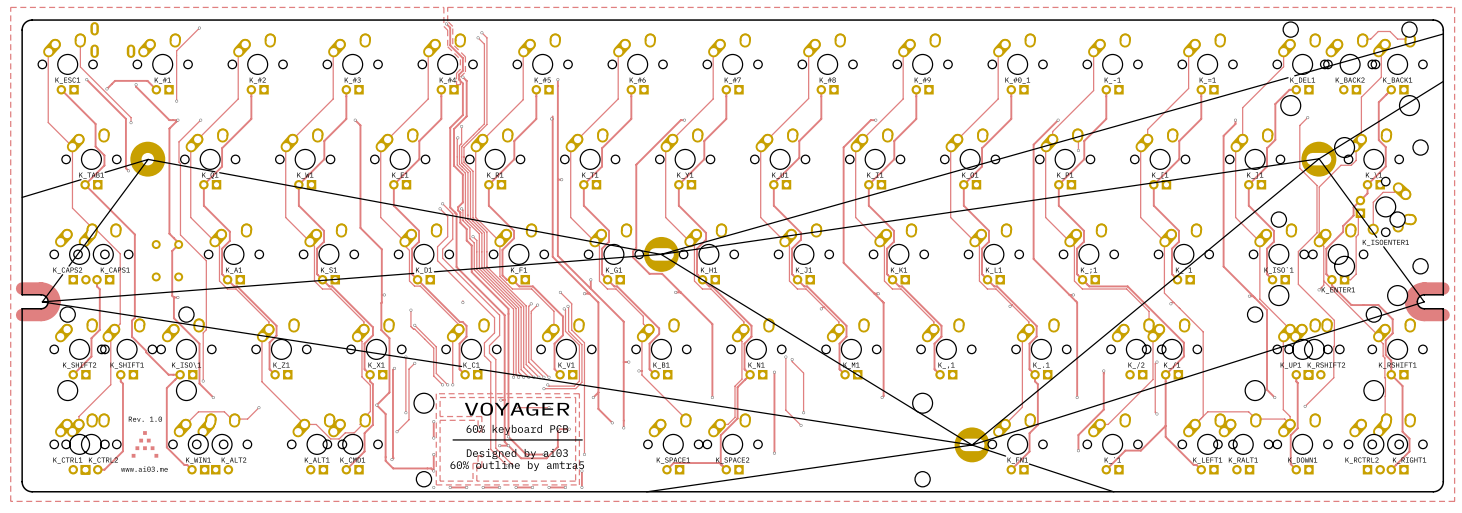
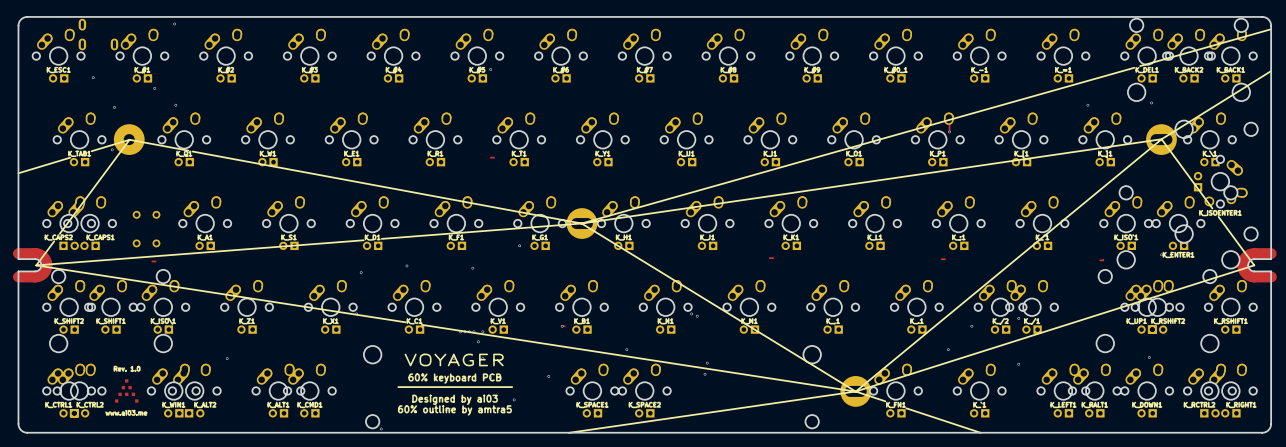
zone outline: (10, 7) (443, 7) (443, 26) (447, 30) (447, 46) (460, 59) (460, 69) (456, 73) (456, 84) (460, 84) (460, 77) (465, 72) (465, 56) (452, 44) (452, 26) (447, 21) (447, 7) (1454, 7) (1454, 501) (10, 501) (10, 7) -> none
track: (446, 23) (450, 27) (450, 45) (462, 58) (462, 70) (459, 74) (459, 79) (462, 83) (462, 115) (450, 127) (450, 207) (456, 214) (456, 267) (504, 315) (504, 441) (521, 458) (546, 458) (557, 446) (557, 429) (569, 429) -> none
via: (446, 23) -> none
track: (198, 28) (176, 50) (176, 101) -> none
track: (481, 32) (486, 37) (486, 124) (463, 147) (463, 162) (473, 171) (473, 218) (486, 231) (486, 266) (526, 305) (526, 364) (538, 377) -> none
via: (481, 32) -> none
track: (478, 37) (484, 44) (484, 123) (461, 146) (461, 163) (470, 171) (470, 218) (484, 232) (484, 267) (523, 306) (523, 367) (533, 377) -> none
via: (478, 37) -> none
track: (80, 39) (80, 66) (131, 117) (131, 122) -> none
track: (1362, 39) (1370, 39) (1378, 31) (1390, 31) (1397, 39) (1410, 39) -> none
track: (48, 51) (48, 122) (72, 146) (72, 208) (90, 226) (90, 234) -> none
track: (238, 51) (238, 98) (197, 139) -> none
track: (333, 51) (333, 98) (292, 139) -> none
track: (428, 51) (428, 98) (387, 139) -> none
track: (523, 51) (523, 99) (475, 147) (475, 217) (499, 241) -> none
track: (618, 51) (618, 98) (577, 139) -> none
track: (713, 51) (713, 98) (672, 139) -> none
track: (808, 51) (808, 98) (767, 139) -> none
track: (903, 51) (903, 98) (862, 139) -> none
track: (998, 51) (998, 98) (957, 139) -> none
track: (1093, 51) (1093, 90) (1052, 131) (1052, 139) -> none
track: (1188, 51) (1188, 88) (1147, 129) (1147, 139) -> none
track: (1283, 51) (1283, 66) (1242, 107) (1242, 139) -> none
track: (1378, 51) (1381, 54) (1381, 77) (1361, 97) (1361, 139) -> none
track: (462, 77) (466, 80) (466, 116) (454, 128) -> none
via: (462, 77) -> none
track: (86, 79) (125, 118) (125, 168) (128, 170) -> none
via: (86, 79) -> none
track: (557, 79) (557, 255) (623, 321) (623, 427) -> none
track: (136, 84) (169, 120) (177, 120) (169, 128) (169, 233) (180, 244) -> none
via: (136, 84) -> none
track: (106, 88) (115, 80) (147, 80) (156, 89) -> none
track: (61, 89) (95, 123) (95, 146) (104, 155) (104, 165) (85, 184) (134, 234) (134, 317) (132, 320) (132, 336) (168, 374) (180, 374) (166, 388) (166, 447) (191, 469) -> none
track: (251, 89) (251, 118) (222, 148) (222, 166) (203, 184) (203, 205) (229, 231) (229, 240) (222, 248) (222, 274) (276, 325) (276, 335) (269, 342) (269, 369) (275, 374) -> none
track: (346, 89) (346, 118) (324, 140) (324, 159) (298, 184) (298, 205) (324, 230) (324, 241) (317, 248) (317, 274) (372, 327) (372, 335) (364, 343) (364, 369) (370, 374) (370, 381) (372, 384) (372, 424) (364, 433) (364, 451) (346, 469) -> none
track: (441, 89) (441, 118) (419, 140) (419, 159) (393, 184) (393, 205) (419, 230) (419, 241) (412, 248) (412, 274) (459, 321) (466, 325) (466, 336) (459, 343) (459, 369) (465, 374) -> none
track: (536, 89) (536, 118) (514, 140) (514, 159) (488, 184) (488, 205) (514, 230) (514, 238) (502, 249) (502, 275) (506, 279) (512, 279) (519, 286) (532, 286) (562, 316) (562, 335) (554, 343) (554, 369) (560, 374) -> none
track: (631, 89) (631, 118) (602, 148) (602, 166) (583, 184) (583, 205) (609, 230) (609, 241) (602, 248) (602, 274) (614, 286) (617, 286) (659, 328) (659, 334) (649, 343) (649, 369) (655, 374) -> none
track: (726, 89) (726, 118) (704, 140) (704, 159) (678, 184) (678, 205) (706, 232) (706, 239) (697, 248) (697, 274) (751, 325) (751, 336) (744, 343) (744, 369) (750, 374) (737, 387) (737, 418) (720, 435) (720, 464) -> none
track: (821, 89) (821, 118) (799, 140) (799, 157) (773, 183) (773, 205) (801, 232) (801, 239) (792, 248) (792, 274) (846, 325) (846, 336) (839, 343) (839, 369) (845, 374) -> none
track: (916, 89) (916, 118) (894, 140) (894, 159) (868, 184) (868, 205) (893, 230) (893, 241) (887, 248) (887, 274) (941, 325) (941, 336) (934, 343) (934, 369) (940, 374) -> none
track: (1011, 89) (1011, 118) (982, 148) (982, 166) (963, 184) (963, 205) (988, 230) (988, 241) (982, 248) (982, 274) (1036, 325) (1036, 336) (1029, 343) (1029, 369) (1035, 374) (1035, 381) (1037, 384) (1037, 424) (1029, 433) (1029, 451) (1011, 469) -> none
track: (1106, 89) (1106, 118) (1084, 140) (1084, 159) (1058, 184) (1058, 205) (1083, 230) (1083, 241) (1076, 248) (1076, 274) (1089, 286) (1127, 286) (1183, 342) (1183, 356) (1165, 374) (1165, 436) (1193, 464) (1196, 464) (1201, 469) -> none
track: (1201, 89) (1201, 118) (1179, 140) (1179, 159) (1153, 184) (1153, 205) (1178, 230) (1178, 241) (1171, 248) (1171, 274) (1177, 279) -> none
track: (1296, 89) (1289, 89) (1275, 103) (1275, 139) (1267, 148) (1267, 166) (1248, 184) (1248, 205) (1273, 230) (1273, 241) (1266, 248) (1266, 274) (1272, 279) -> none
track: (1391, 89) (1378, 102) (1378, 140) (1385, 147) (1385, 166) (1367, 184) (1367, 193) (1353, 207) (1353, 215) (1343, 225) (1343, 231) (1326, 248) (1326, 274) (1331, 279) (1331, 285) (1351, 305) (1363, 305) -> none
track: (552, 116) (552, 256) (598, 302) (598, 408) (612, 422) -> none
track: (1307, 117) (1299, 125) (1299, 168) (1316, 185) (1316, 232) (1298, 251) (1298, 284) (1334, 320) (1334, 346) (1333, 377) (1305, 406) -> none
via: (551, 118) -> none
via: (177, 120) -> none
track: (200, 120) (179, 141) (179, 162) (180, 234) (206, 260) (206, 329) (203, 332) (203, 381) -> none
track: (355, 120) (360, 125) (360, 227) (381, 249) (381, 330) (389, 338) (389, 392) (376, 405) (385, 413) (385, 460) (393, 468) (431, 468) (433, 470) (433, 454) -> none
via: (355, 120) -> none
track: (684, 120) (680, 120) (636, 164) (636, 248) (633, 251) (633, 257) (649, 273) (662, 273) (712, 324) (712, 397) -> none
via: (684, 120) -> none
track: (875, 120) (870, 120) (843, 147) (843, 262) (883, 302) (882, 397) -> none
via: (875, 120) -> none
track: (1058, 120) (1033, 144) (1033, 258) (1077, 302) (1077, 397) -> none
via: (1058, 120) -> none
track: (1235, 120) (1235, 123) (1223, 135) (1223, 266) (1267, 309) (1267, 389) (1274, 397) -> none
track: (461, 126) (459, 164) (467, 172) (467, 219) (481, 233) (481, 267) (521, 307) (521, 369) (528, 377) -> none
via: (461, 126) -> none
track: (454, 128) (454, 165) (462, 174) (462, 202) (458, 207) (460, 212) -> none
track: (457, 137) (457, 165) (465, 173) (465, 219) (479, 233) (479, 268) (518, 307) (518, 372) (523, 377) -> none
via: (457, 137) -> none
track: (191, 146) (190, 217) (219, 246) (219, 281) (227, 289) (236, 289) (268, 321) (268, 329) -> none
track: (286, 146) (285, 217) (314, 246) (314, 281) (322, 289) (331, 289) (363, 321) (363, 329) -> none
track: (381, 146) (380, 217) (404, 241) -> none
track: (571, 146) (570, 217) (599, 246) (599, 281) (607, 289) (616, 289) (643, 316) (643, 323) (648, 329) -> none
track: (666, 146) (665, 217) (694, 246) (694, 281) (702, 289) (711, 289) (743, 321) (743, 329) -> none
track: (761, 146) (760, 217) (789, 246) (789, 281) (797, 289) (806, 289) (838, 321) (838, 329) -> none
track: (856, 146) (855, 217) (884, 246) (884, 281) (892, 289) (901, 289) (933, 321) (933, 329) -> none
track: (951, 146) (950, 217) (979, 246) (979, 281) (987, 289) (996, 289) (1028, 321) (1028, 329) -> none
track: (1046, 146) (1045, 217) (1074, 246) (1074, 281) (1082, 289) (1126, 289) (1149, 311) (1149, 332) (1153, 336) (1153, 379) (1108, 424) (1100, 424) -> none
track: (1141, 146) (1140, 217) (1164, 241) (1164, 293) (1203, 331) (1203, 416) -> none
track: (1236, 146) (1235, 217) (1259, 241) (1259, 299) (1290, 329) -> none
track: (1356, 146) (1356, 160) (1351, 165) (1341, 165) (1319, 187) (1319, 241) (1323, 246) (1323, 285) (1319, 289) -> none
via: (561, 179) -> none
track: (1398, 187) (1393, 192) (1383, 192) (1373, 202) (1373, 229) -> none
track: (442, 203) (452, 213) (452, 239) (442, 249) (442, 258) (499, 315) (499, 335) (489, 345) (489, 353) (495, 359) (495, 448) (512, 465) -> none
via: (442, 203) -> none
track: (440, 208) (447, 216) (447, 236) (437, 246) (437, 260) (494, 317) (494, 332) (484, 343) (484, 355) (490, 362) (490, 449) (507, 465) -> none
via: (440, 208) -> none
track: (461, 208) (462, 220) (469, 227) (469, 238) (474, 243) (474, 269) (513, 309) (513, 377) -> none
via: (461, 208) -> none
track: (460, 212) (460, 222) (466, 229) (466, 240) (471, 245) (471, 272) (508, 308) (508, 436) (526, 454) (543, 454) -> none
track: (1360, 213) (1358, 215) (1358, 234) (1356, 236) (1356, 274) (1350, 279) (1344, 279) -> none
track: (92, 229) (95, 229) (120, 253) (120, 323) (114, 329) -> none
track: (473, 236) (476, 240) (476, 269) (516, 308) (516, 374) (518, 377) -> none
via: (473, 236) -> none
track: (404, 241) (404, 245) (409, 250) (409, 281) (414, 286) (420, 286) (458, 324) (458, 329) -> none
track: (499, 241) (499, 276) (512, 289) (531, 289) (553, 311) (553, 329) -> none
track: (178, 244) (172, 250) (173, 318) (199, 343) (199, 383) (213, 397) -> none
track: (96, 279) (96, 286) (99, 289) (99, 329) (91, 338) (91, 356) (73, 374) -> none
track: (590, 279) (590, 288) -> none
track: (1323, 281) (1378, 335) (1378, 339) (1383, 343) (1385, 424) -> none
track: (560, 292) (571, 303) (571, 329) (584, 342) (584, 454) -> none
via: (560, 292) -> none
track: (675, 292) (680, 292) -> none
via: (675, 292) -> none
track: (584, 293) (589, 293) -> none
via: (584, 293) -> none
via: (878, 293) -> none
via: (384, 294) -> none
via: (1073, 294) -> none
via: (1249, 296) -> none
via: (177, 297) -> none
track: (1173, 302) (1170, 303) -> none
track: (531, 303) (528, 306) (528, 362) (543, 377) -> none
via: (531, 303) -> none
via: (1170, 303) -> none
track: (537, 305) (531, 311) (531, 359) (549, 377) -> none
track: (1363, 305) (1378, 305) (1392, 319) (1392, 333) (1385, 340) (1385, 355) (1391, 360) (1391, 374) (1402, 385) (1402, 431) (1409, 438) (1409, 451) (1391, 469) -> none
track: (568, 306) (568, 331) (581, 344) (581, 382) (575, 388) (543, 388) -> none
via: (568, 306) -> none
via: (1010, 306) -> none
track: (824, 307) (821, 308) -> none
track: (564, 308) (565, 331) (579, 345) (579, 381) (574, 386) (547, 384) -> none
via: (564, 308) -> none
via: (821, 308) -> none
track: (410, 310) (410, 326) (433, 348) (433, 376) (442, 384) -> none
track: (414, 325) (436, 346) (436, 373) (447, 384) -> none
via: (414, 325) -> none
track: (108, 336) (110, 339) (110, 384) (78, 416) (78, 424) -> none
track: (262, 336) (261, 381) (304, 424) (316, 424) (330, 438) (339, 438) (345, 432) (354, 432) (365, 421) -> none
track: (357, 336) (361, 341) (361, 376) (370, 385) (370, 411) (359, 424) -> none
track: (452, 336) (452, 384) -> none
track: (642, 336) (641, 375) (685, 419) -> none
track: (737, 336) (741, 341) (741, 379) (735, 386) (735, 417) (727, 424) (720, 424) -> none
track: (1022, 336) (1022, 407) (1005, 424) -> none
track: (1283, 336) (1283, 409) (1290, 416) (1290, 424) (1284, 419) (1255, 419) (1248, 411) (1207, 411) (1195, 424) -> none
track: (405, 357) (405, 412) -> none
track: (785, 357) (785, 410) (801, 425) -> none
track: (792, 359) (803, 373) (803, 412) -> none
track: (623, 362) (628, 362) -> none
via: (628, 362) -> none
track: (1156, 362) (1155, 363) (1155, 412) (1156, 413) -> none
track: (414, 363) (409, 369) (409, 419) (397, 431) -> none
via: (414, 363) -> none
track: (394, 368) (391, 459) -> none
via: (394, 368) -> none
track: (1103, 370) (1103, 409) (1078, 434) (1078, 450) -> none
track: (774, 372) (774, 453) -> none
via: (774, 372) -> none
track: (120, 374) (120, 381) (122, 383) (122, 451) (104, 469) (97, 469) -> none
track: (1296, 374) (1297, 428) (1290, 435) (1290, 464) (1296, 469) -> none
via: (513, 377) -> none
via: (518, 377) -> none
via: (543, 377) -> none
via: (203, 381) -> none
via: (442, 384) -> none
via: (447, 384) -> none
via: (452, 384) -> none
via: (547, 384) -> none
track: (598, 392) (593, 397) -> none
zone outline: (436, 393) (579, 393) (579, 484) (436, 484) (436, 393) -> none
via: (213, 397) -> none
zone outline: (440, 397) (440, 416) (481, 416) (481, 431) (478, 431) (478, 420) (440, 420) (440, 481) (473, 481) (473, 463) (478, 463) (478, 455) (481, 455) (481, 467) (476, 467) (476, 481) (575, 481) (575, 397) (440, 397) -> none
via: (593, 397) -> none
via: (882, 397) -> none
via: (1274, 397) -> none
track: (500, 400) (504, 400) -> none
via: (500, 400) -> none
via: (376, 405) -> none
track: (258, 407) (247, 419) (237, 419) (234, 421) (224, 411) (198, 411) (185, 424) -> none
track: (516, 407) (549, 407) -> none
via: (405, 412) -> none
track: (433, 421) (433, 438) -> none
via: (433, 421) -> none
via: (612, 422) -> none
track: (1165, 425) (1140, 450) (1125, 450) (1106, 469) -> none
via: (397, 431) -> none
via: (508, 436) -> none
via: (433, 438) -> none
track: (499, 445) (508, 445) -> none
via: (499, 445) -> none
via: (508, 445) -> none
via: (1078, 450) -> none
via: (774, 453) -> none
via: (433, 454) -> none
via: (543, 454) -> none
via: (391, 459) -> none
track: (666, 469) (673, 463) (719, 463) (726, 469) -> none
via: (433, 470) -> none
track: (581, 470) (581, 487) -> none
via: (581, 470) -> none
track: (450, 487) (466, 487) -> none
via: (450, 487) -> none
via: (466, 487) -> none
track: (483, 487) (499, 487) -> none
via: (483, 487) -> none
via: (499, 487) -> none
track: (516, 487) (532, 487) -> none
via: (516, 487) -> none
via: (532, 487) -> none
track: (549, 487) (565, 487) -> none
via: (549, 487) -> none
via: (565, 487) -> none
via: (581, 487) -> none

